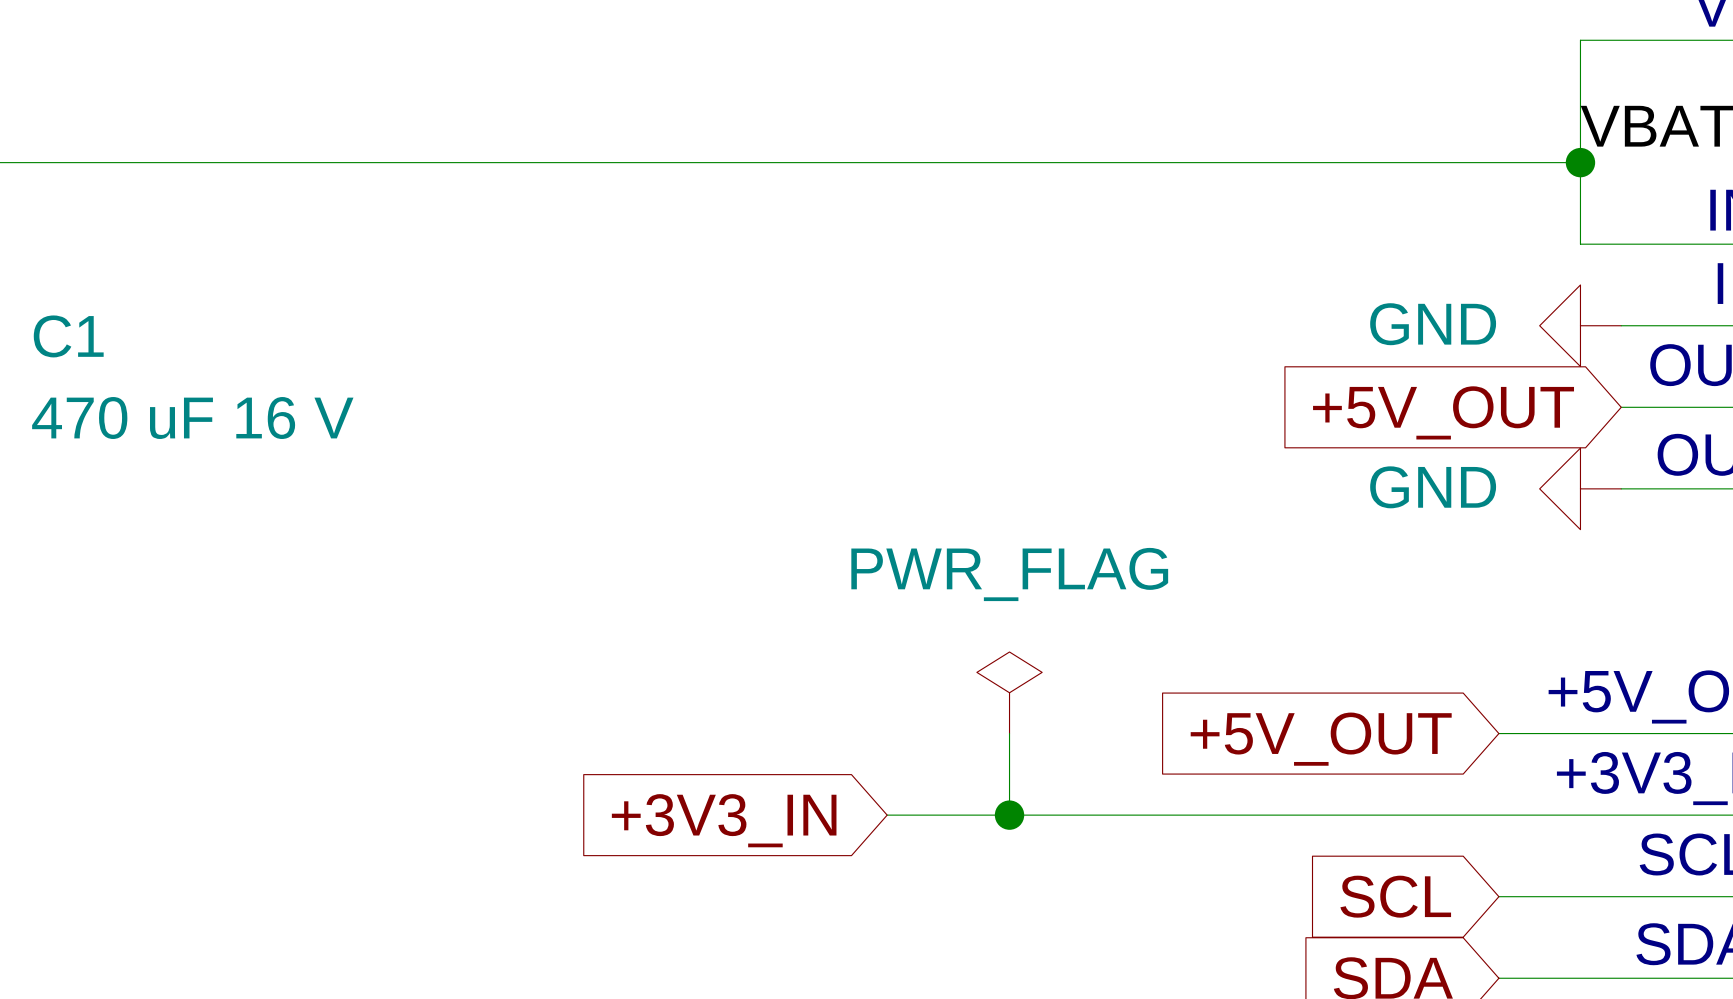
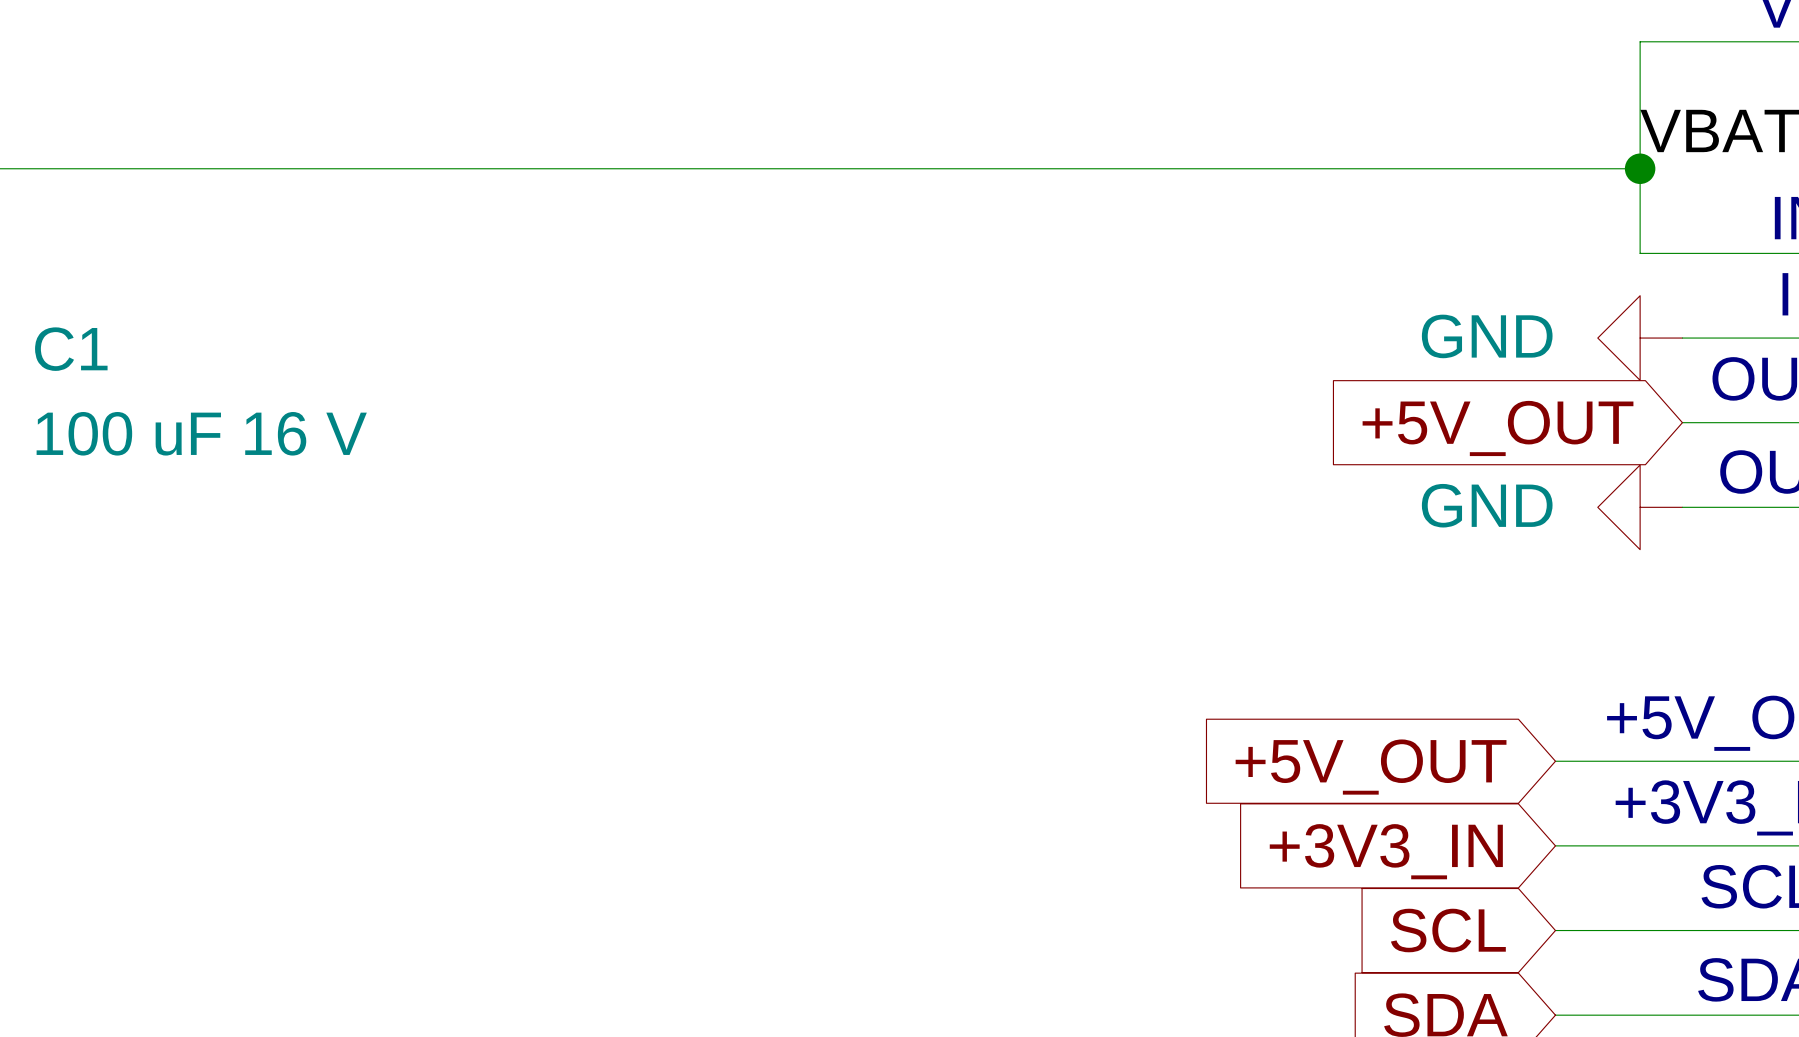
C1 value: 470 uF 16 V (192, 418) -> 100 uF 16 V (201, 433)
power symbol: PWR_FLAG (1009, 692) -> none
wire: (1009, 733) (1009, 815) -> none
wire: (887, 815) (1498, 815) -> none
junction: (1009, 815) -> none
global label position: +3V3_IN (724, 820) -> +3V3_IN (1386, 851)

